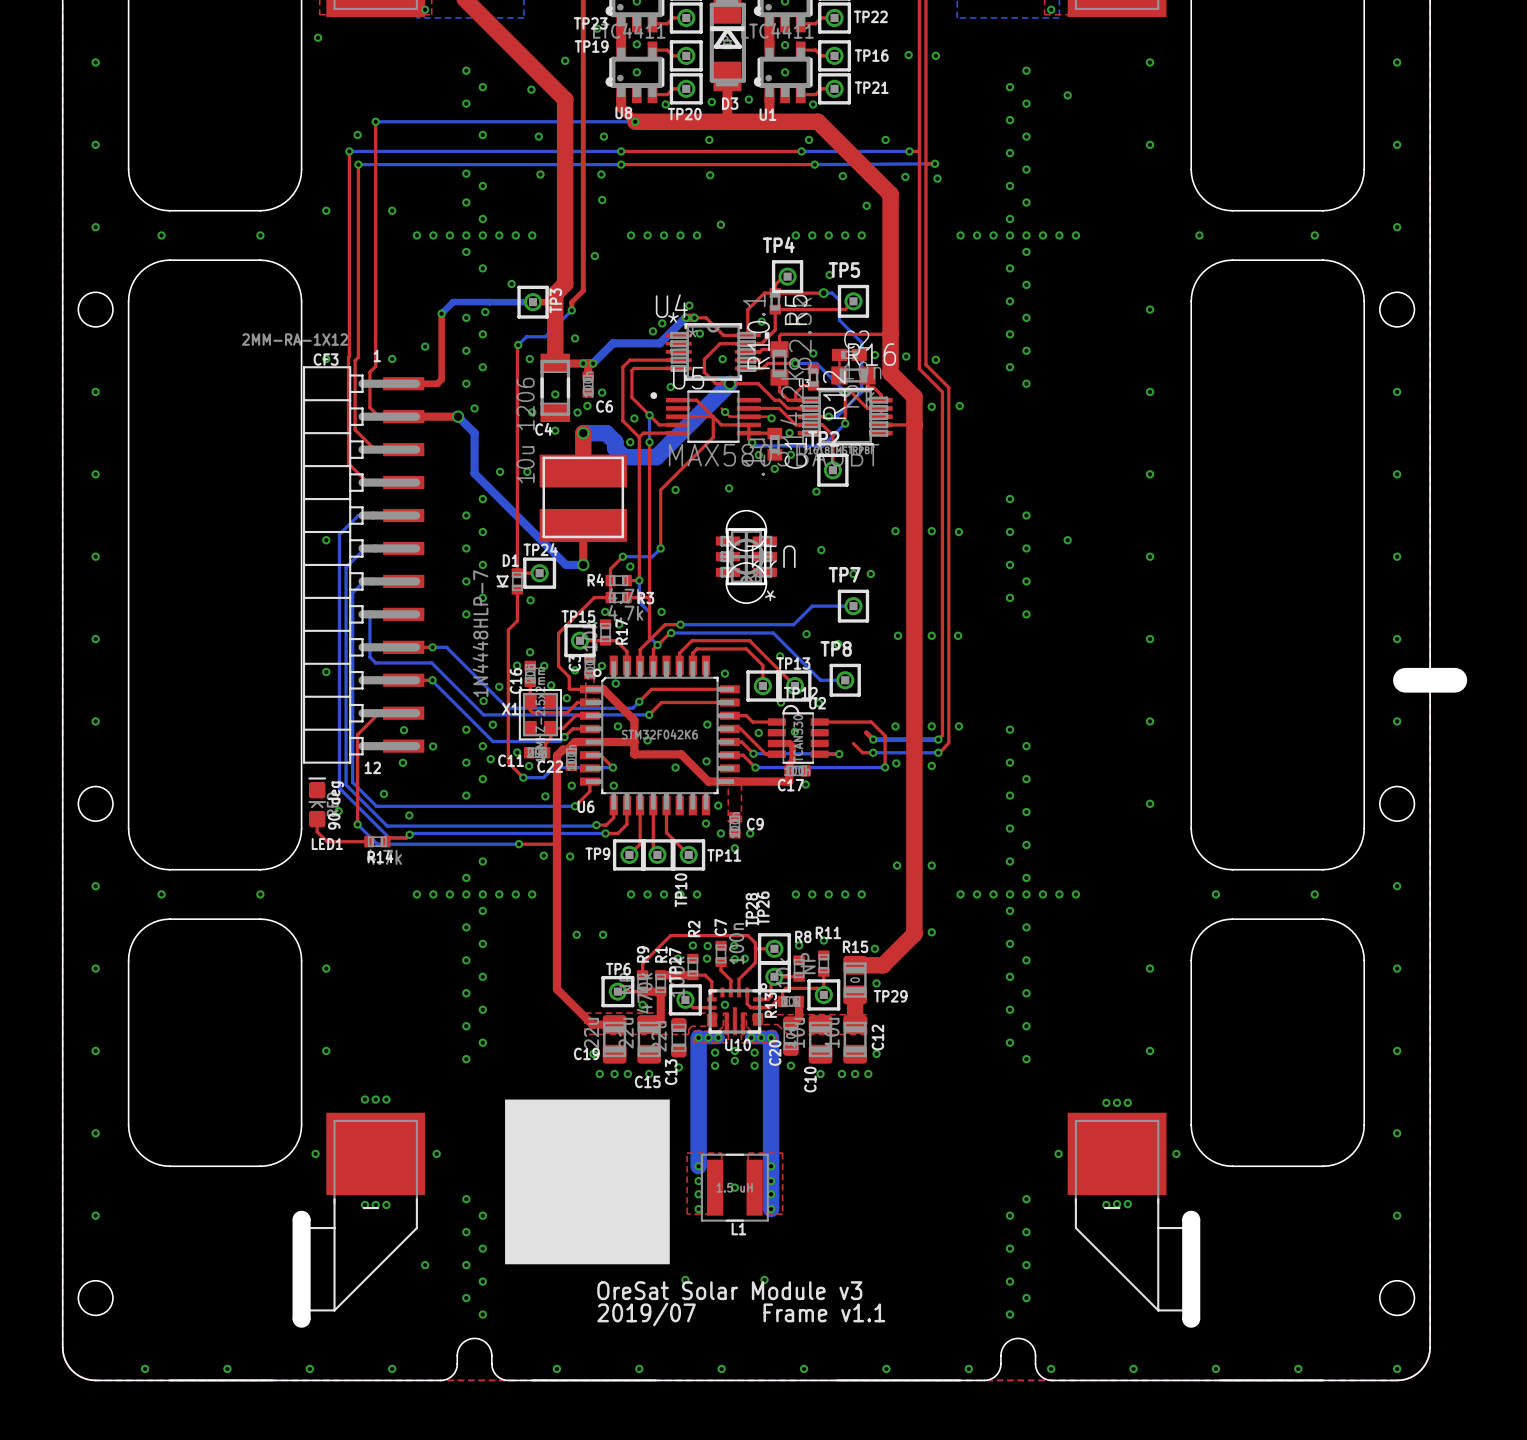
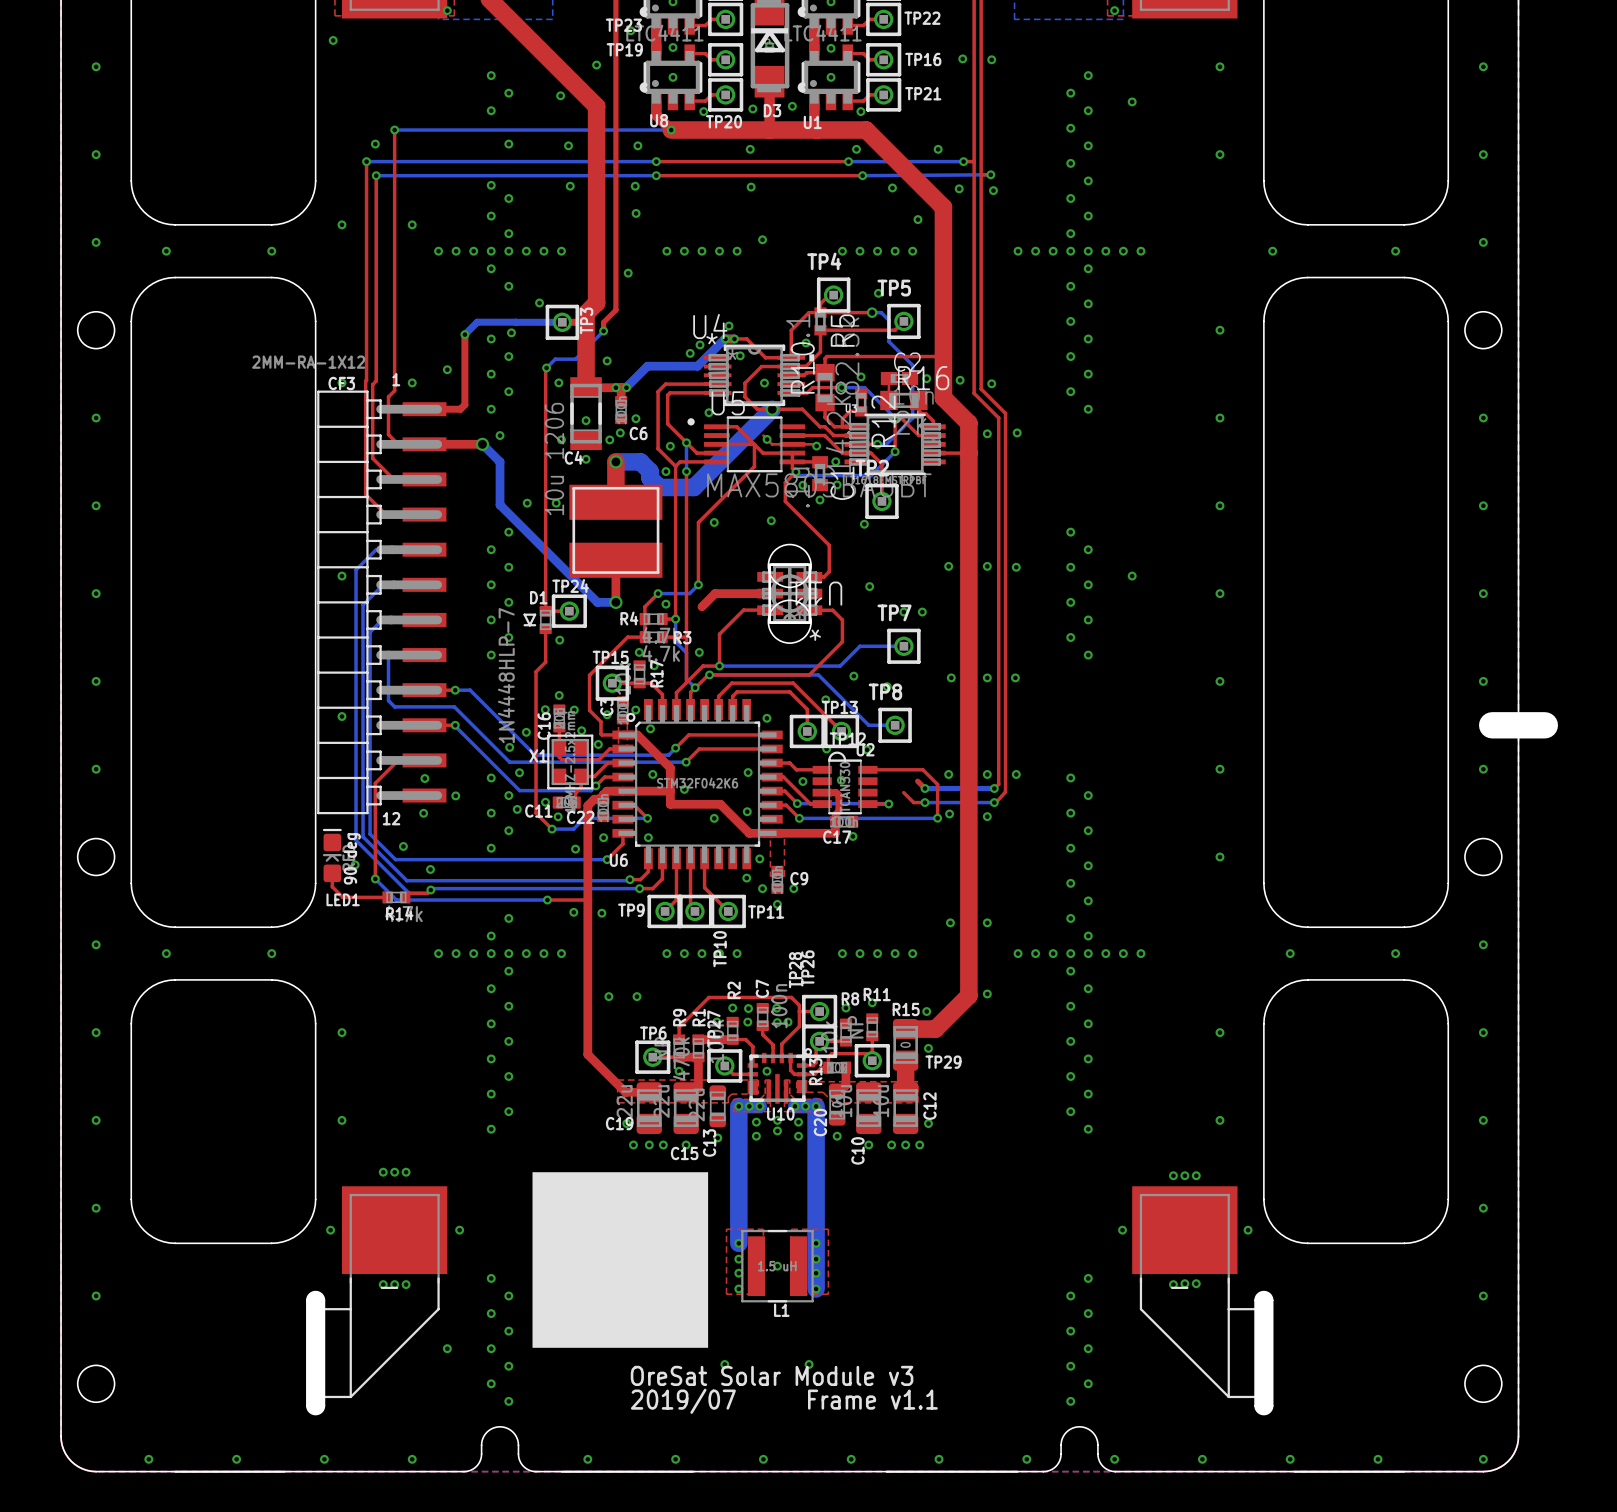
top track: none -> (795, 472) (785, 482) (785, 501) (829, 545) (829, 571) (824, 576) (809, 576)
top track: none -> (770, 593) (715, 593) (701, 606)
top track: none -> (769, 610) (743, 610) (719, 634) (719, 666)
top track: none -> (809, 610) (832, 610) (842, 619) (842, 641) (809, 674) (709, 674)

